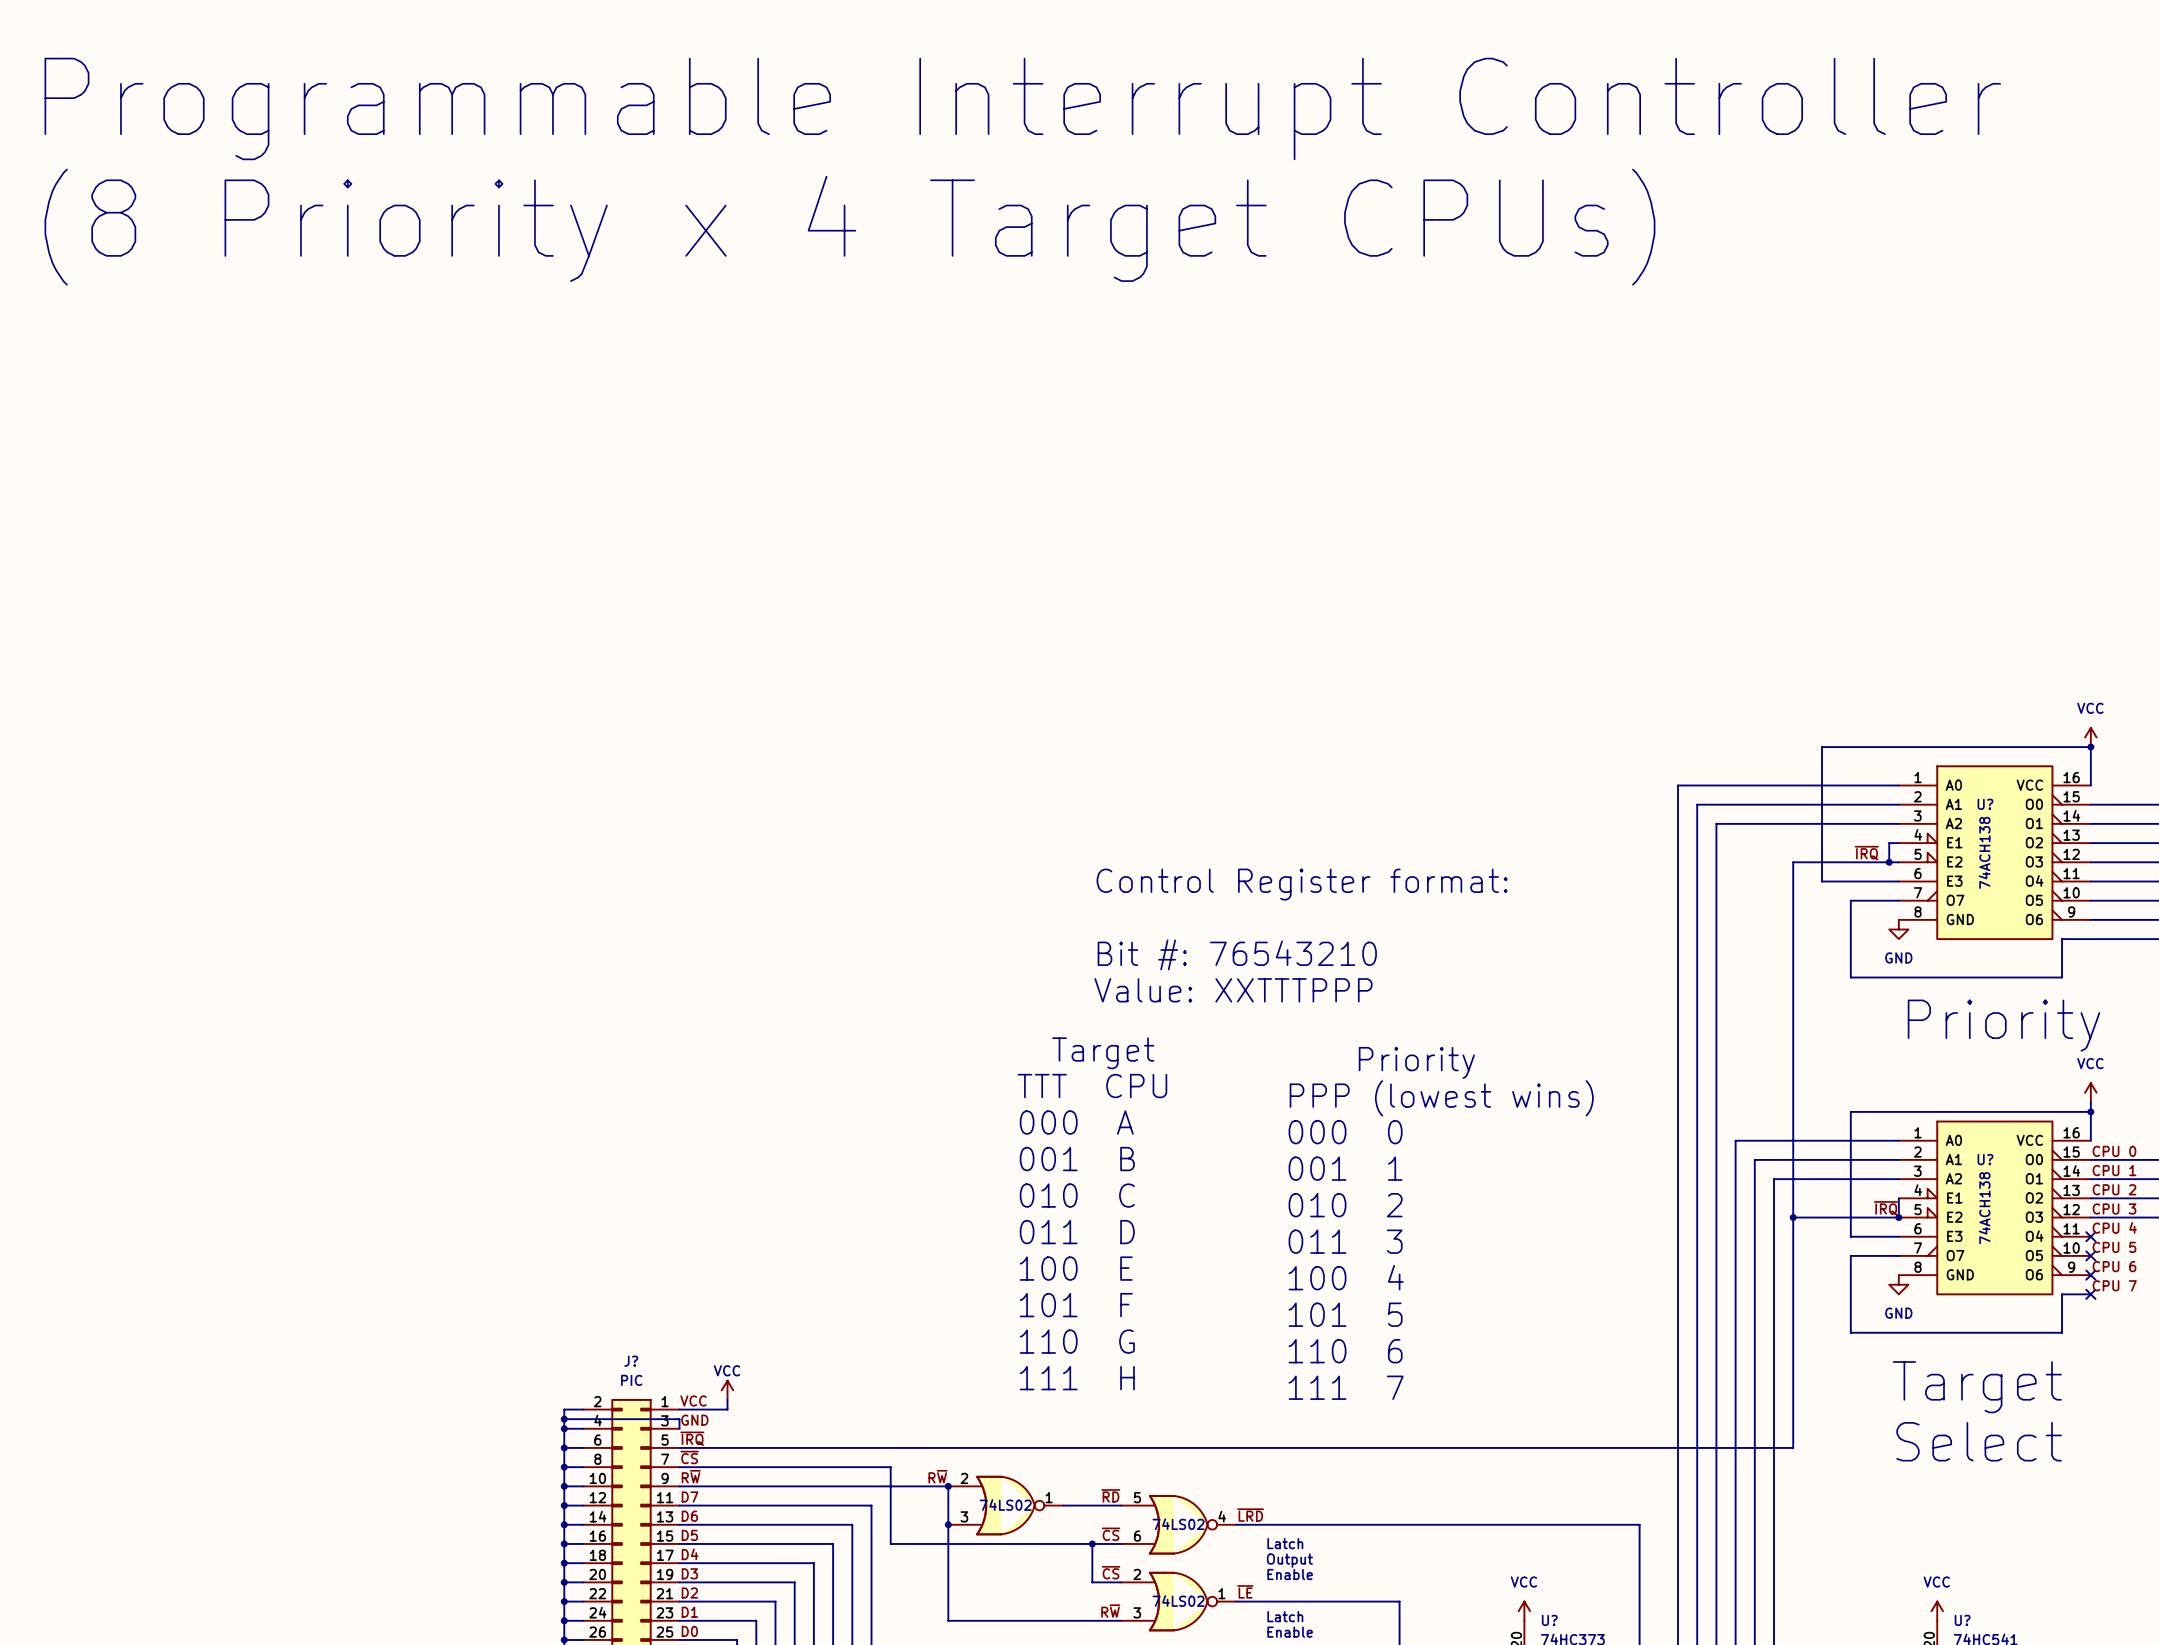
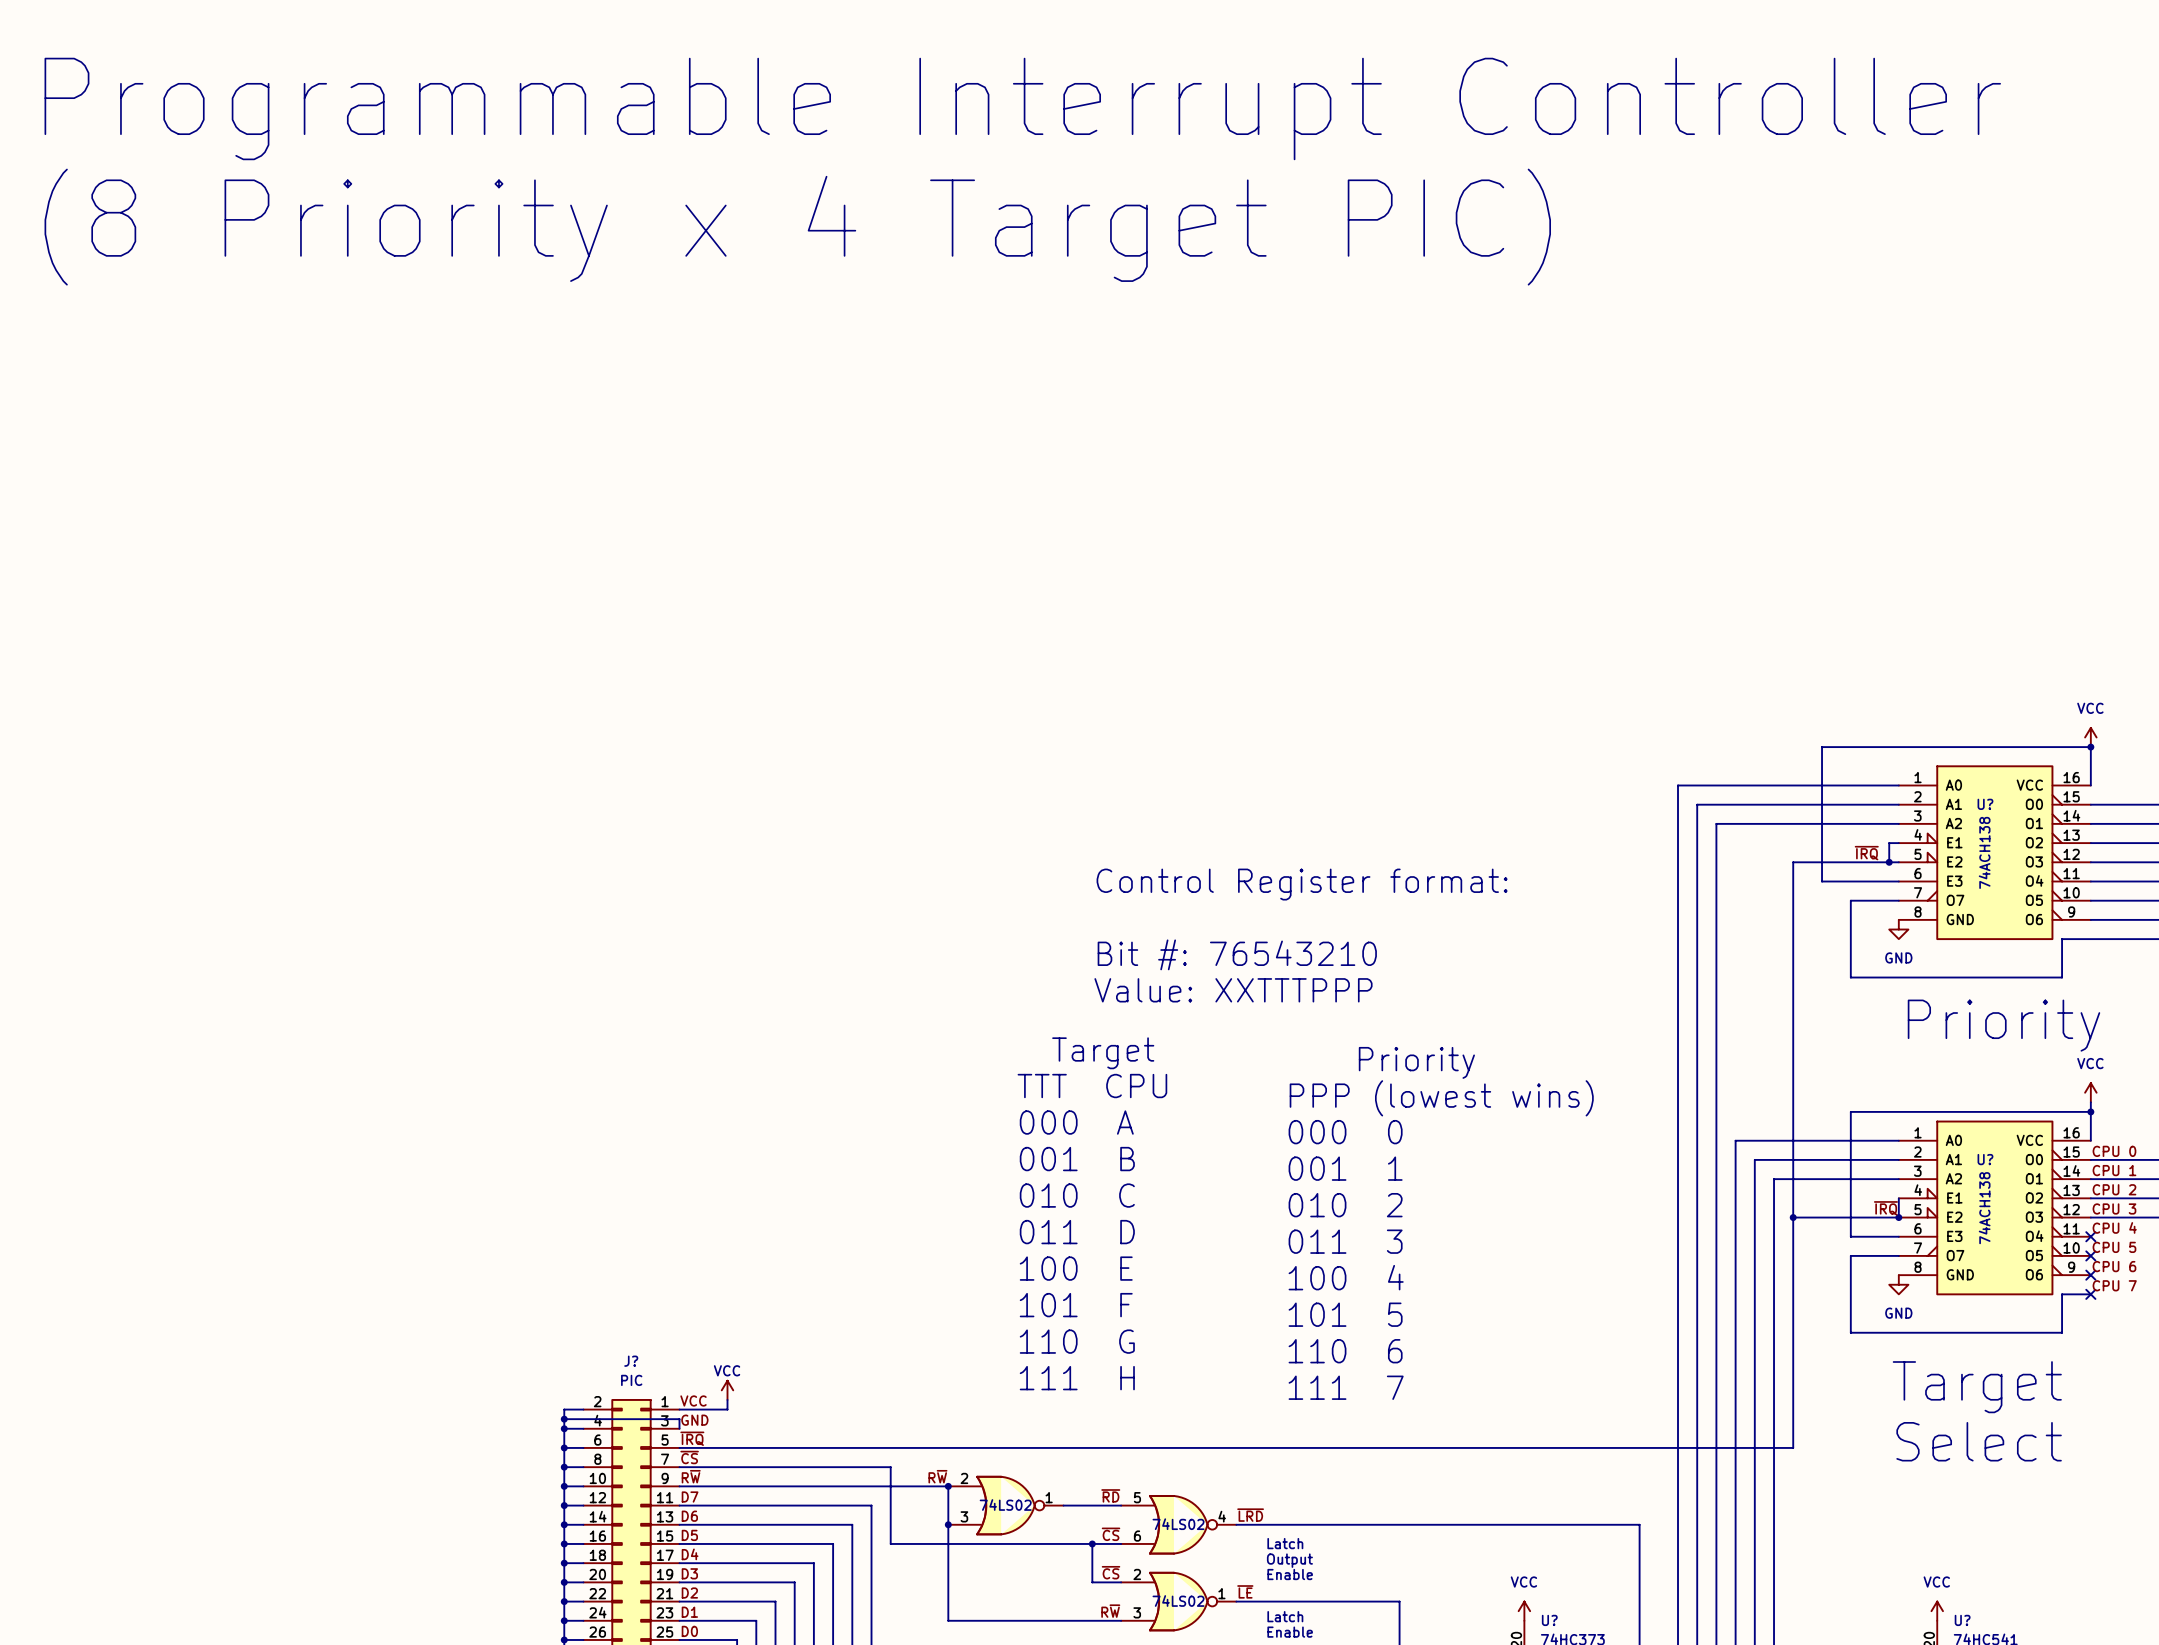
text: (8 Priority x 4 Target CPUs) (849, 227) -> (8 Priority x 4 Target PIC) (797, 227)

